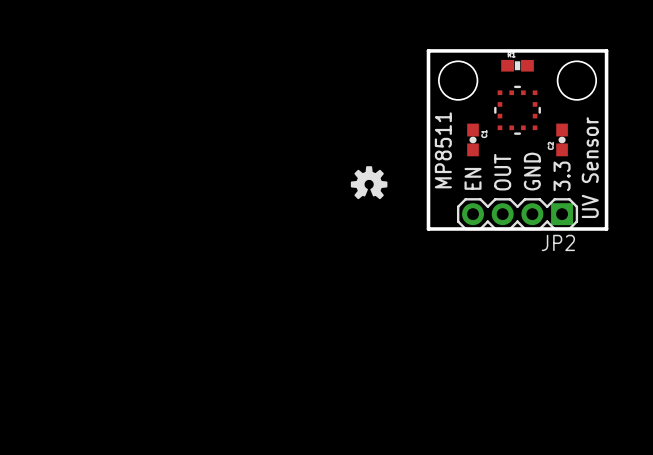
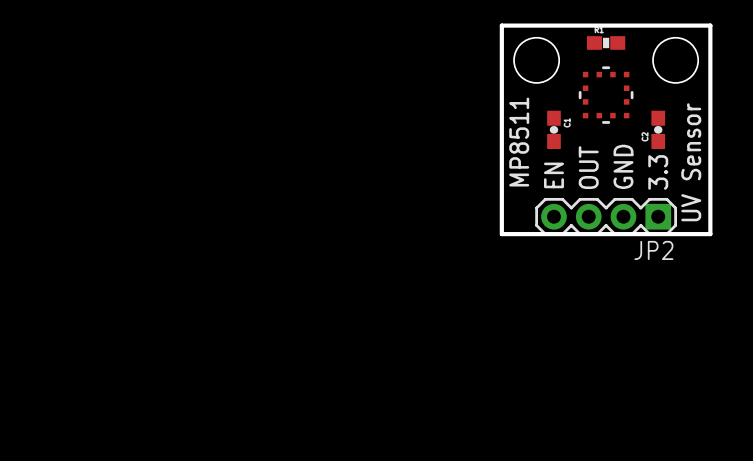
drawing: [350, 166, 388, 200] -> none

